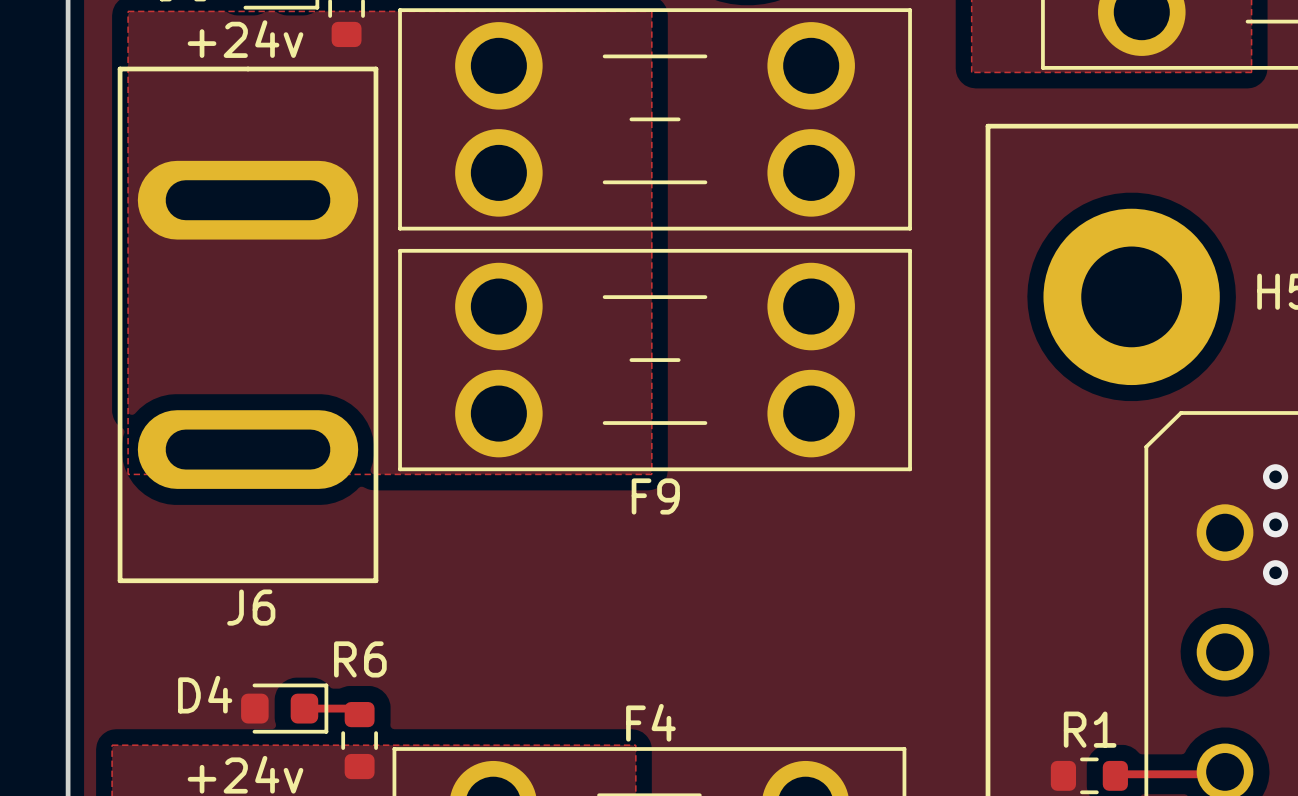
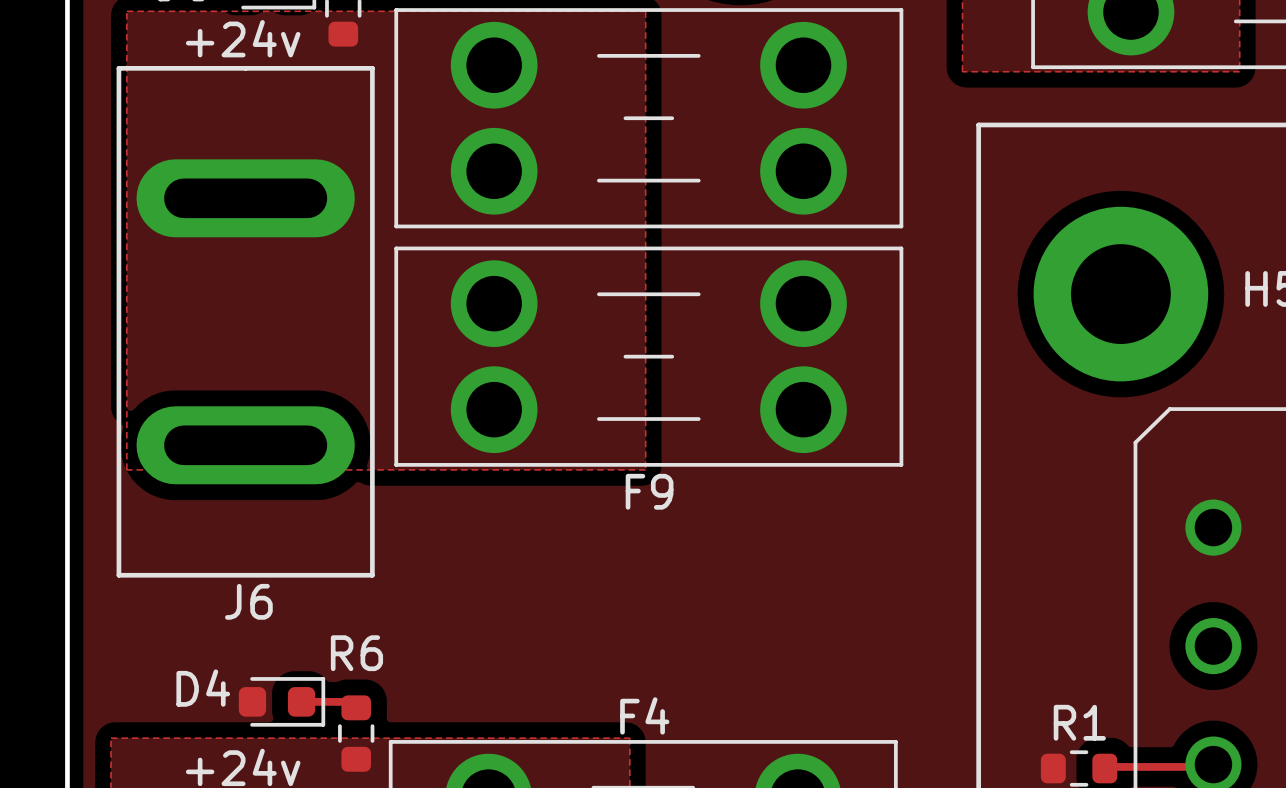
via: (1275, 476) -> none
via: (1275, 524) -> none
via: (1275, 572) -> none

